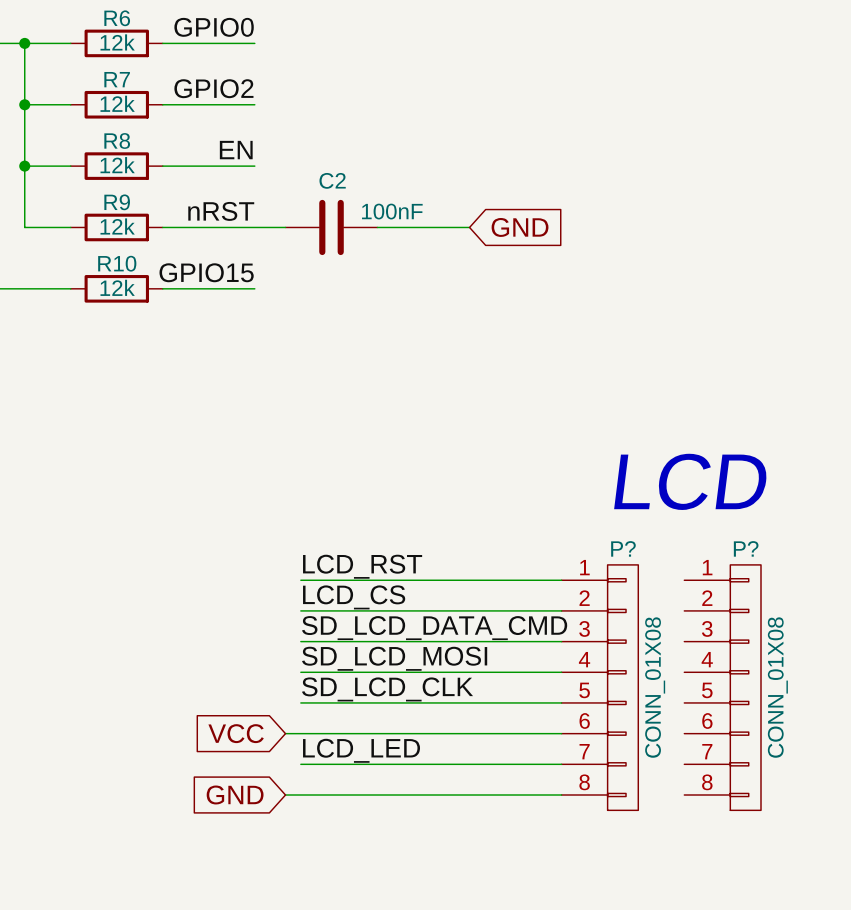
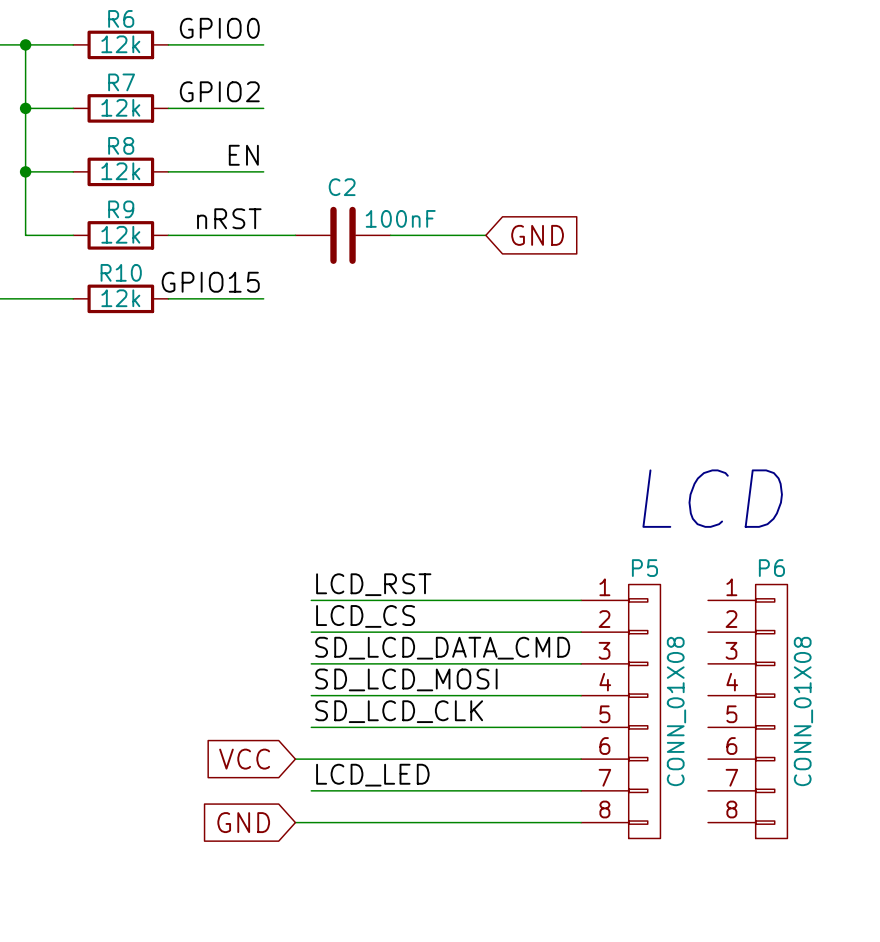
P? name: P? (623, 548) -> P5 (644, 568)
P? name: P? (746, 548) -> P6 (771, 568)

